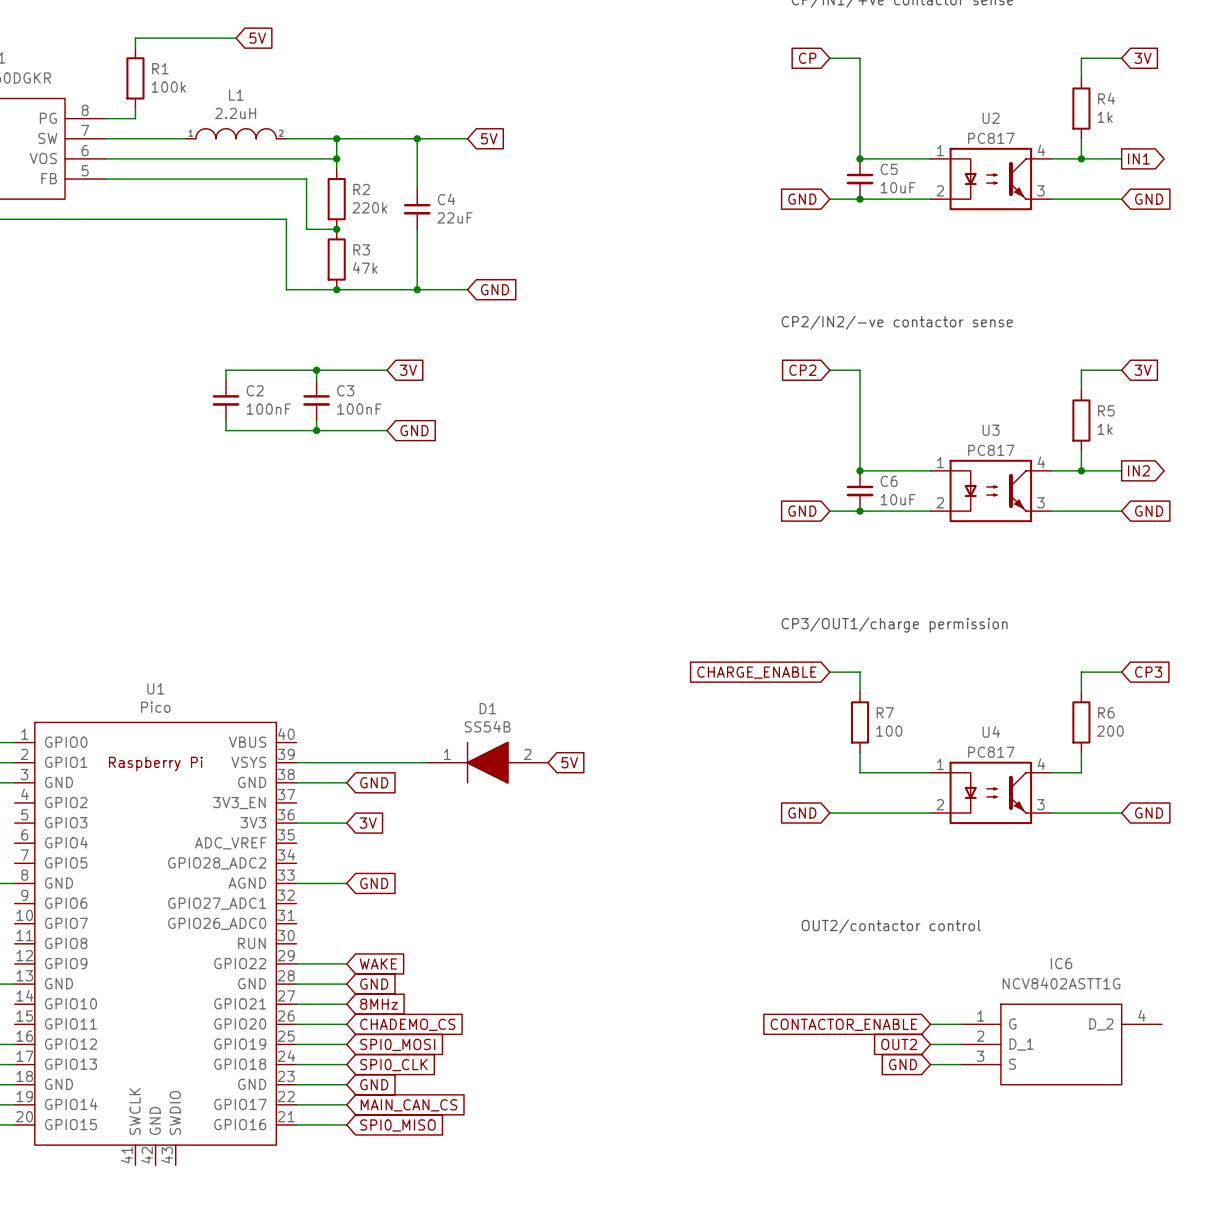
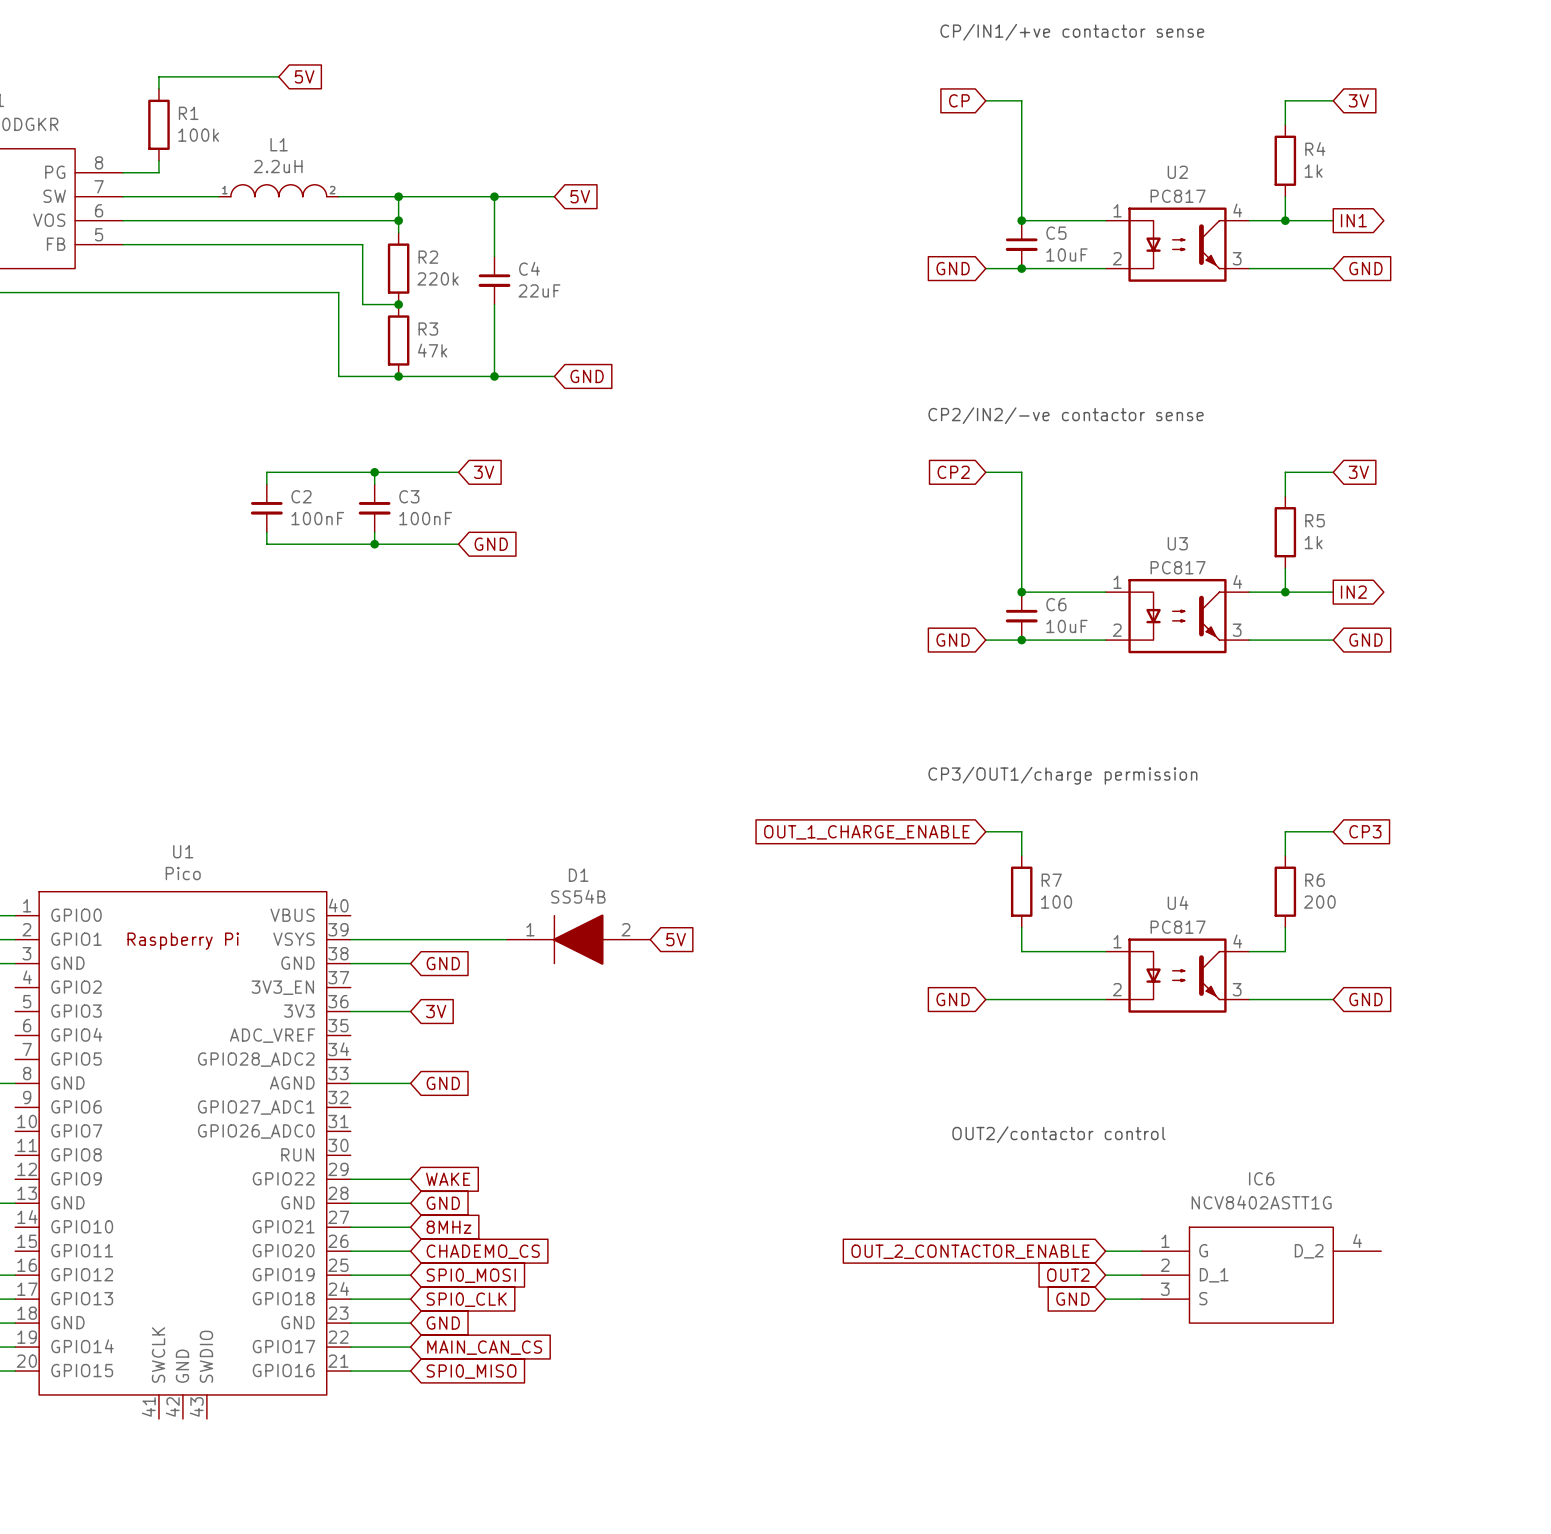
global label: CHARGE_ENABLE (756, 672) -> OUT_1_CHARGE_ENABLE (866, 832)
global label: CONTACTOR_ENABLE (843, 1024) -> OUT_2_CONTACTOR_ENABLE (970, 1251)

